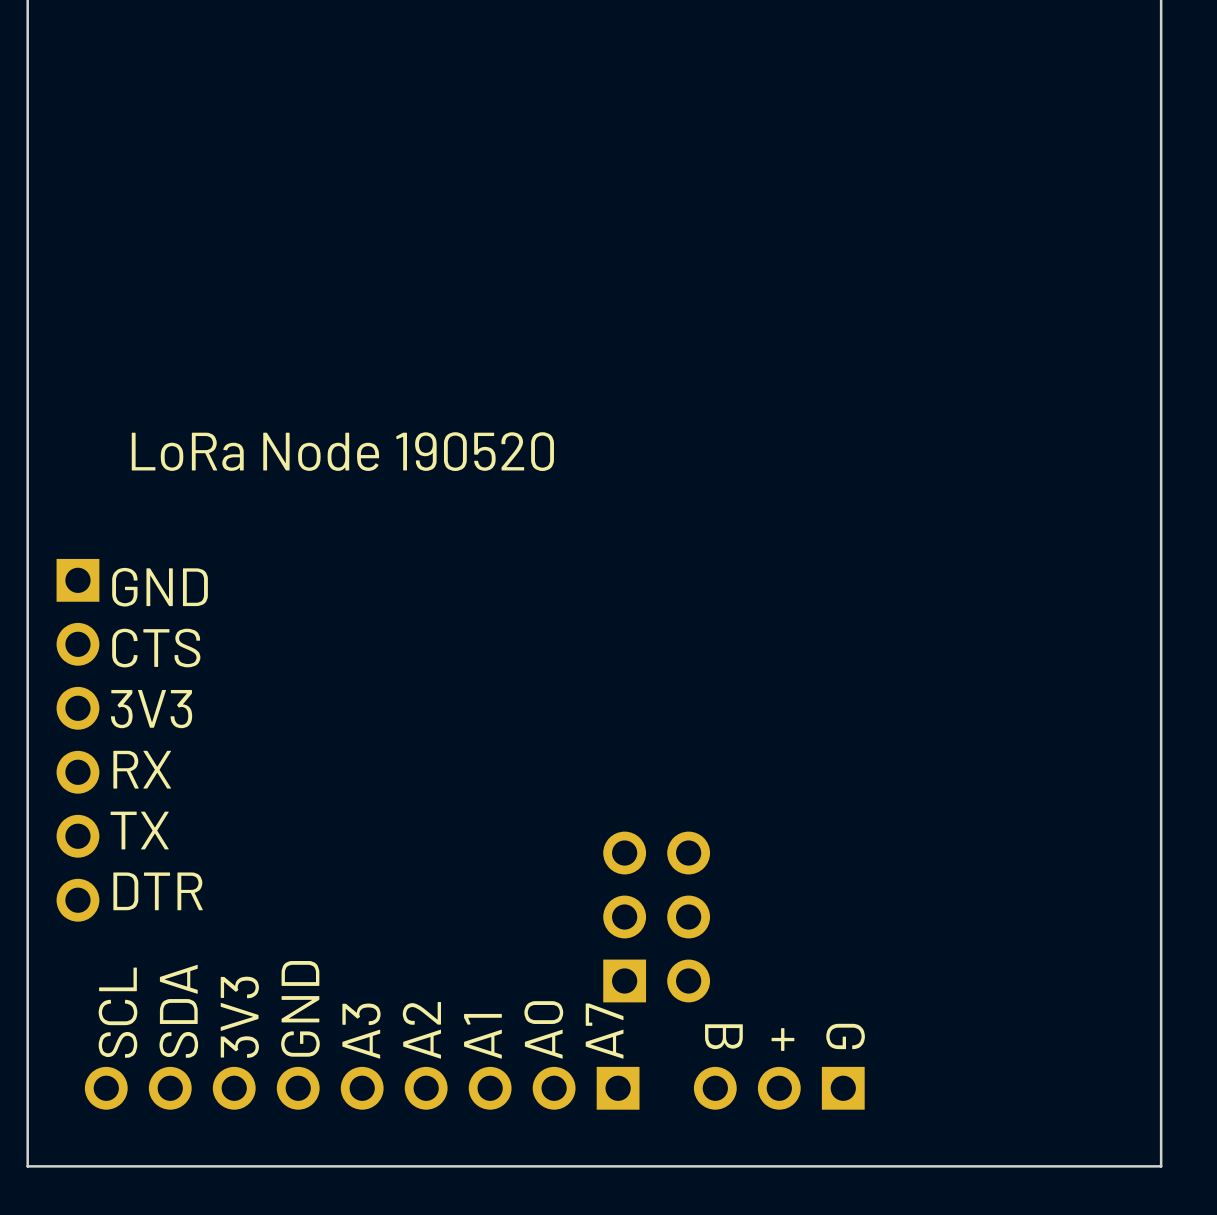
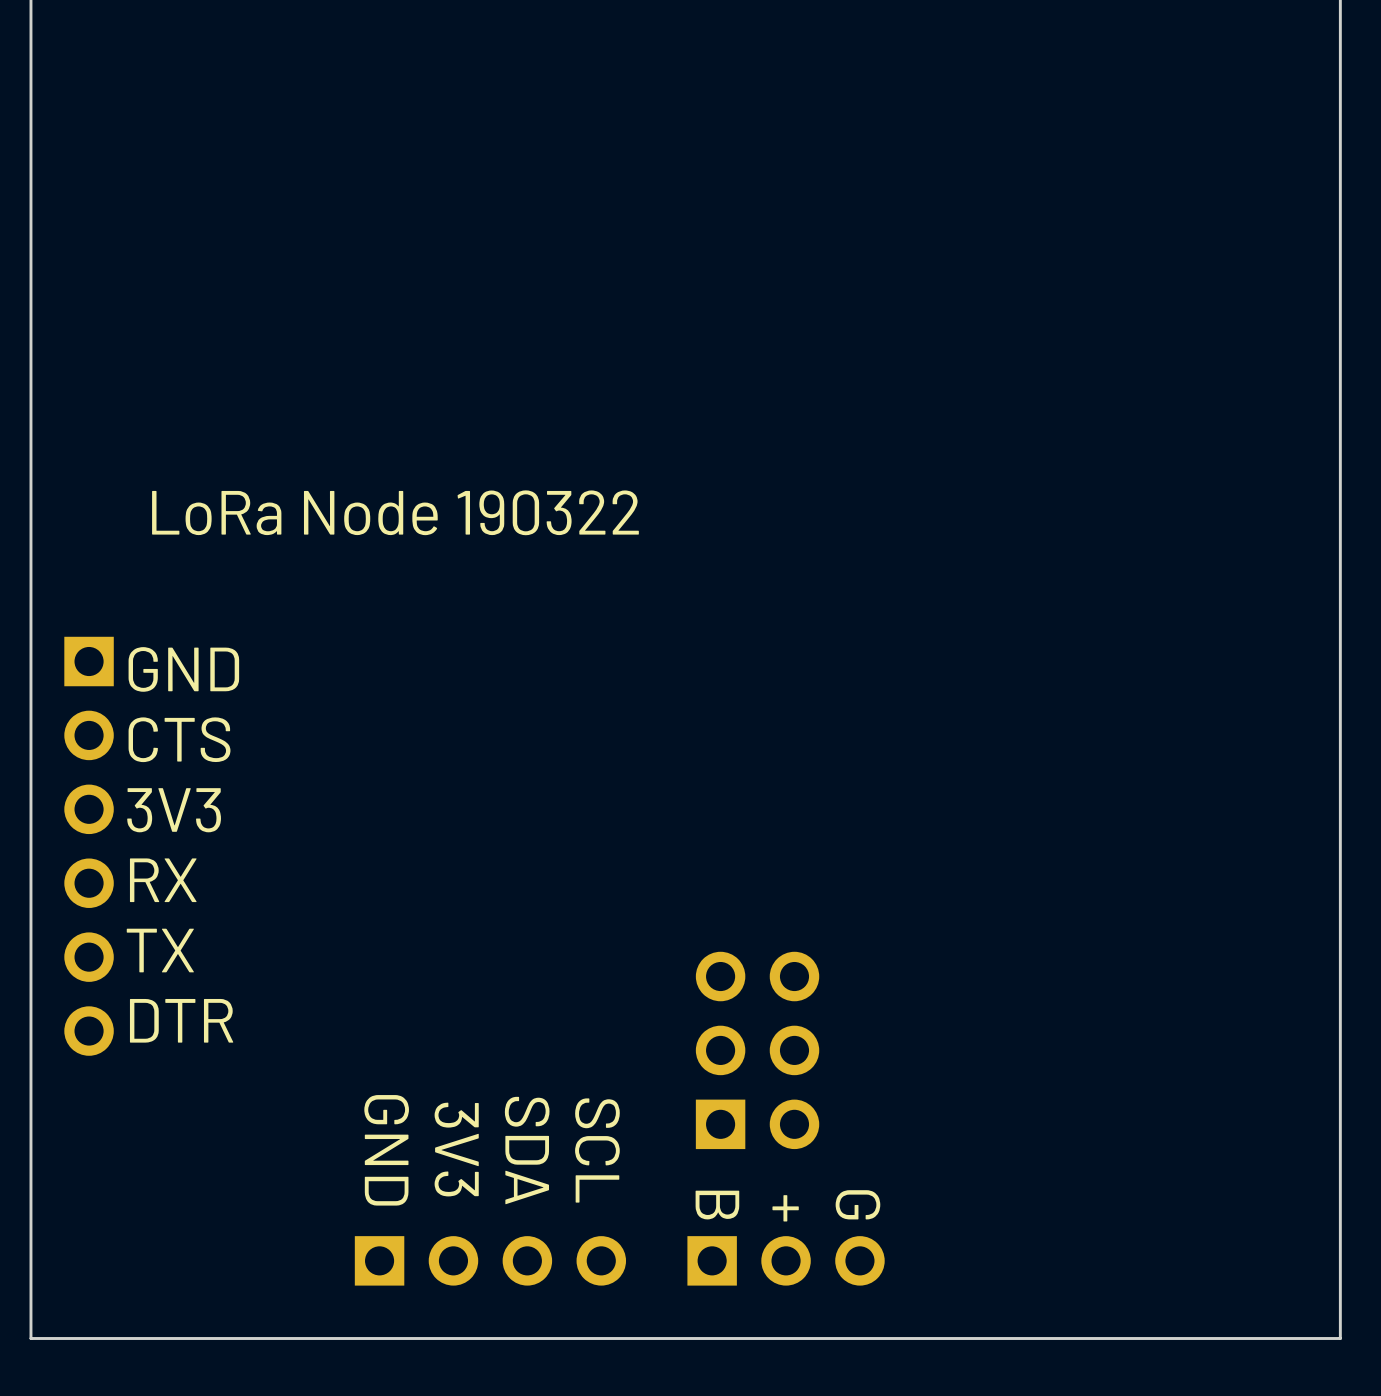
text: LoRa Node 190520 (342, 451) -> LoRa Node 190322 (395, 512)
text rotation: 0° (300, 1008) -> 180° (386, 1150)
text rotation: 0° (178, 1011) -> 180° (527, 1150)
text position: SDA (178, 1011) -> SDA (527, 1150)
text rotation: 0° (118, 1012) -> 180° (597, 1150)
text position: SCL (118, 1012) -> SCL (597, 1150)
text rotation: 0° (239, 1017) -> 180° (456, 1149)
text position: 3V3 (239, 1017) -> 3V3 (456, 1149)
text: A0 (543, 1029) -> none
text: A2 (421, 1030) -> none
text: A3 (361, 1031) -> none
text: A7 (604, 1031) -> none
text: A1 (482, 1036) -> none
text position: B (723, 1036) -> B (717, 1205)
text position: G (845, 1036) -> G (857, 1204)
text position: + (782, 1039) -> + (785, 1208)
part: (362, 1088) -> none
part rotation: 0° (779, 1088) -> 180° (786, 1260)
part: none -> (490, 1260)

